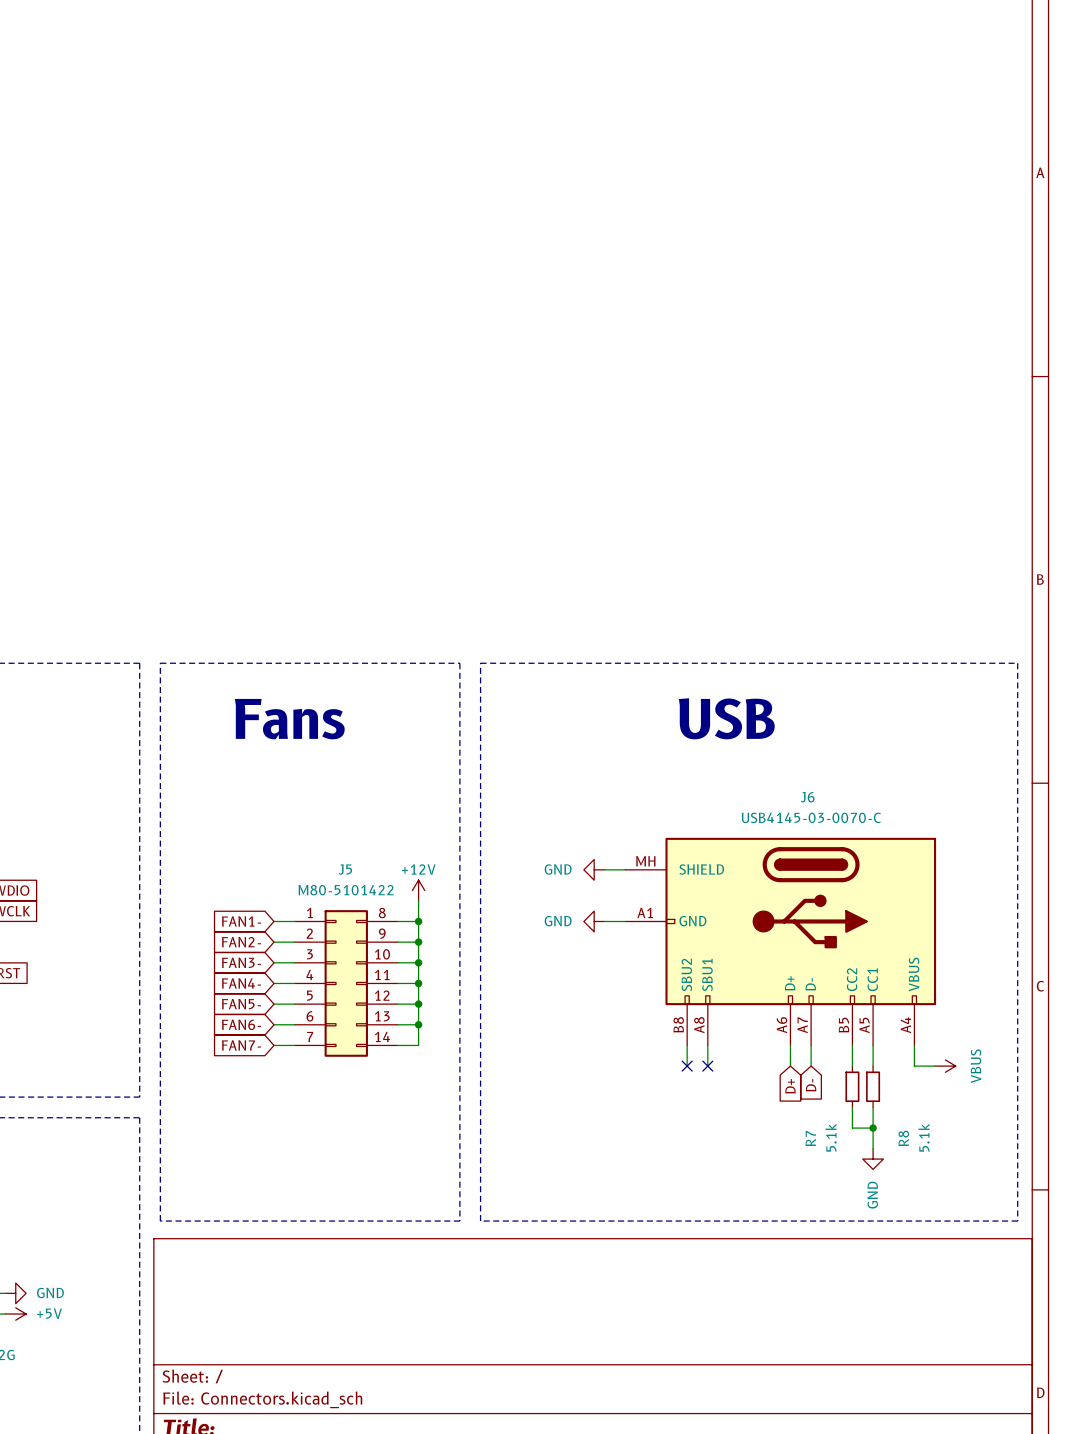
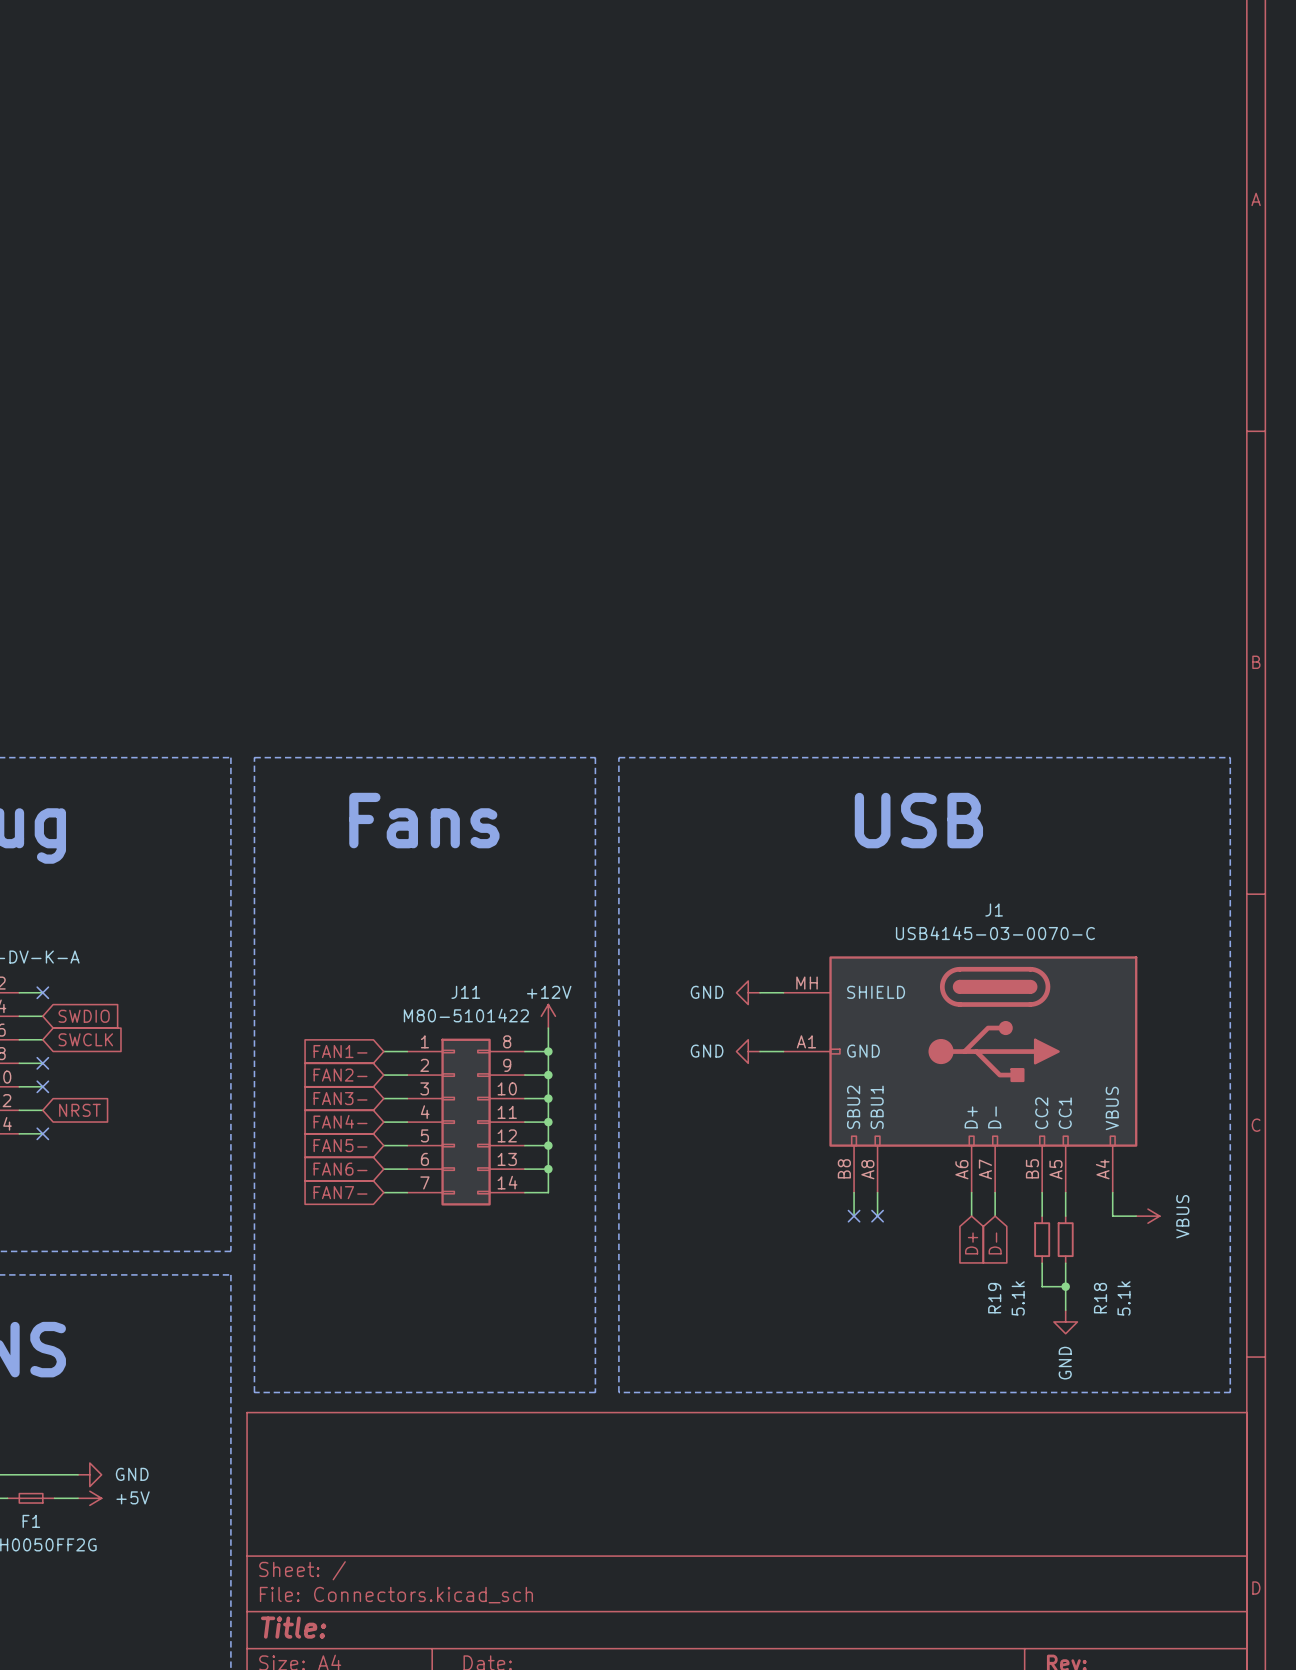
J6 name: J6 (807, 797) -> J1 (994, 910)
J5 name: J5 (345, 869) -> J11 (465, 992)
R7 name: R7 (810, 1138) -> R19 (994, 1298)
R8 name: R8 (903, 1138) -> R18 (1100, 1298)

